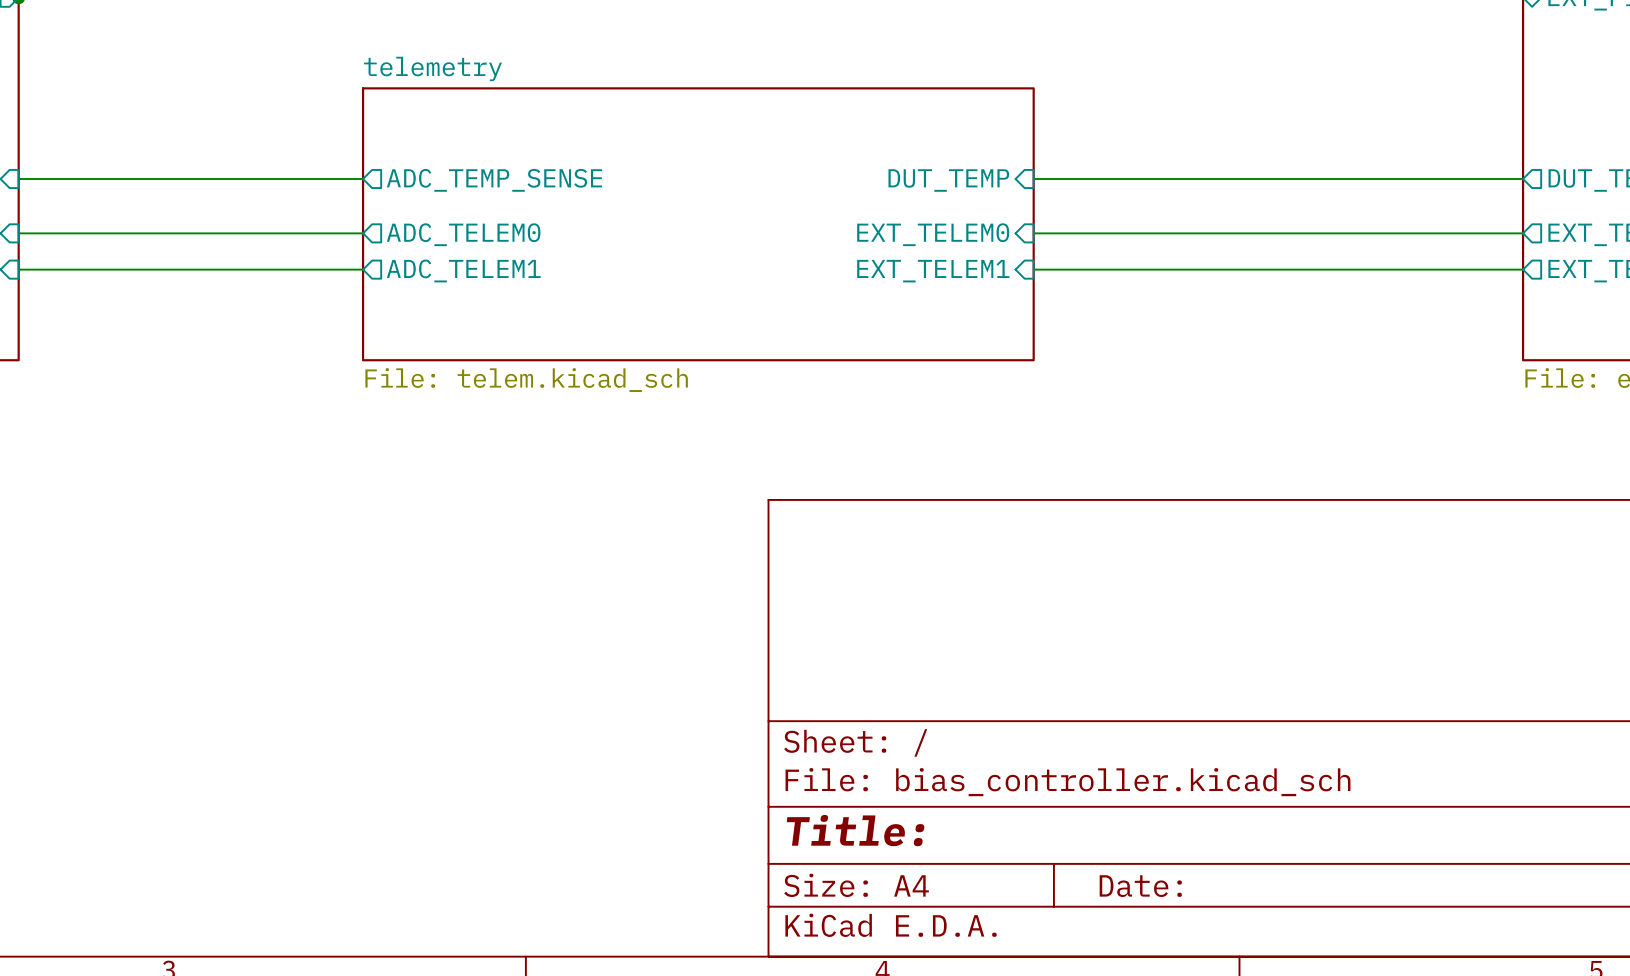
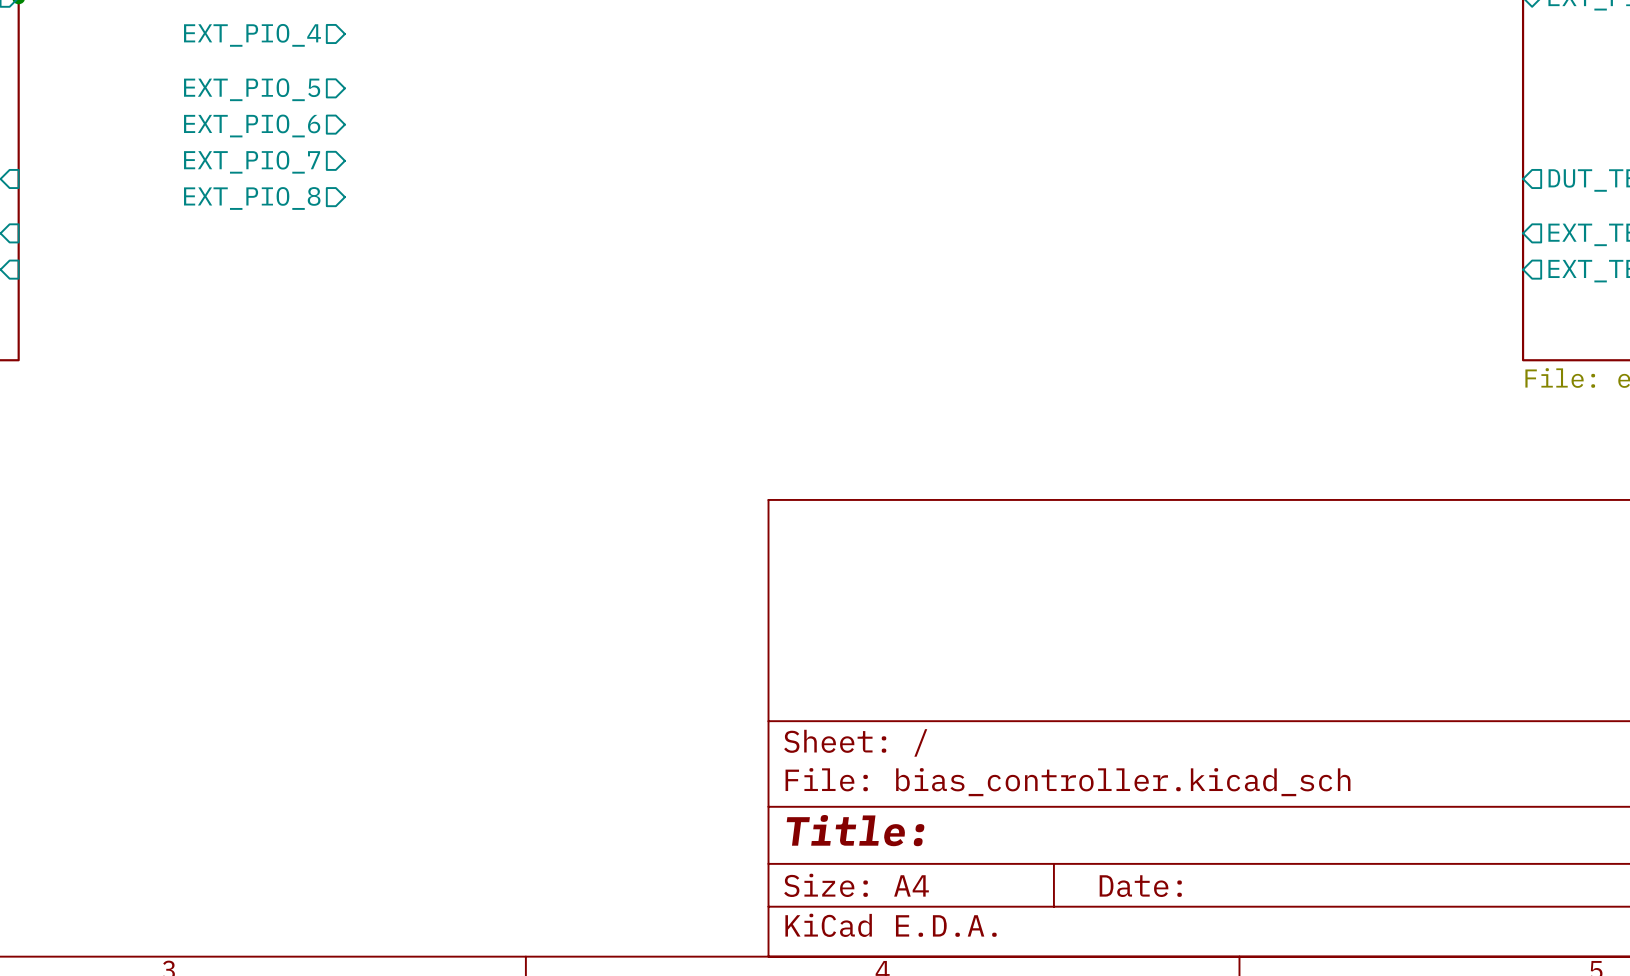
sheet pin: none -> EXT_PIO_4 (252, 35)
sheet pin: none -> EXT_PIO_5 (252, 89)
sheet pin: none -> EXT_PIO_6 (252, 125)
sheet pin: none -> EXT_PIO_7 (252, 162)
wire: (18, 178) (363, 178) -> none
wire: (1033, 178) (1523, 178) -> none
sheet pin: ADC_TEMP_SENSE (494, 180) -> none
sheet pin: DUT_TEMP (948, 180) -> none
sheet pin: none -> EXT_PIO_8 (252, 198)
sheet telemetry: File: telem.kicad_sch (698, 224) -> none
wire: (18, 233) (363, 233) -> none
wire: (1033, 233) (1523, 233) -> none
sheet pin: ADC_TELEM0 (463, 234) -> none
sheet pin: EXT_TELEM0 (933, 234) -> none
wire: (18, 269) (363, 269) -> none
wire: (1033, 269) (1523, 269) -> none
sheet pin: ADC_TELEM1 (463, 270) -> none
sheet pin: EXT_TELEM1 (933, 271) -> none

